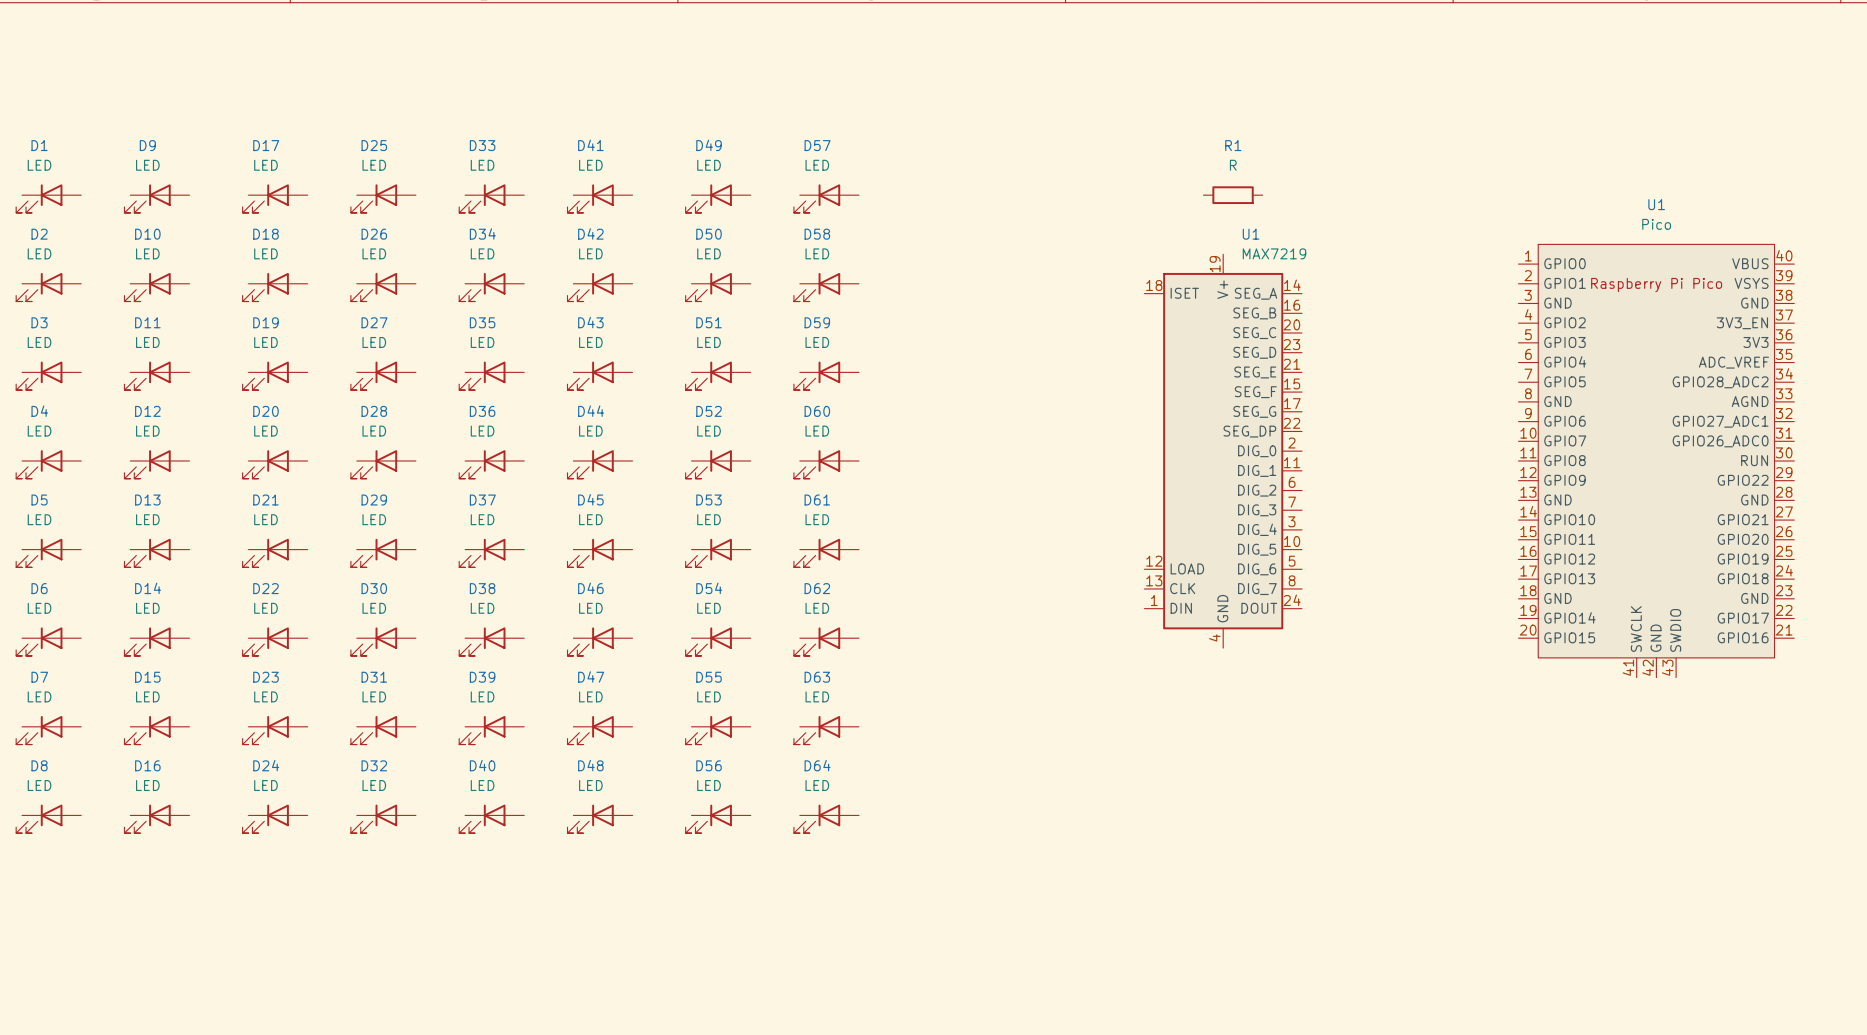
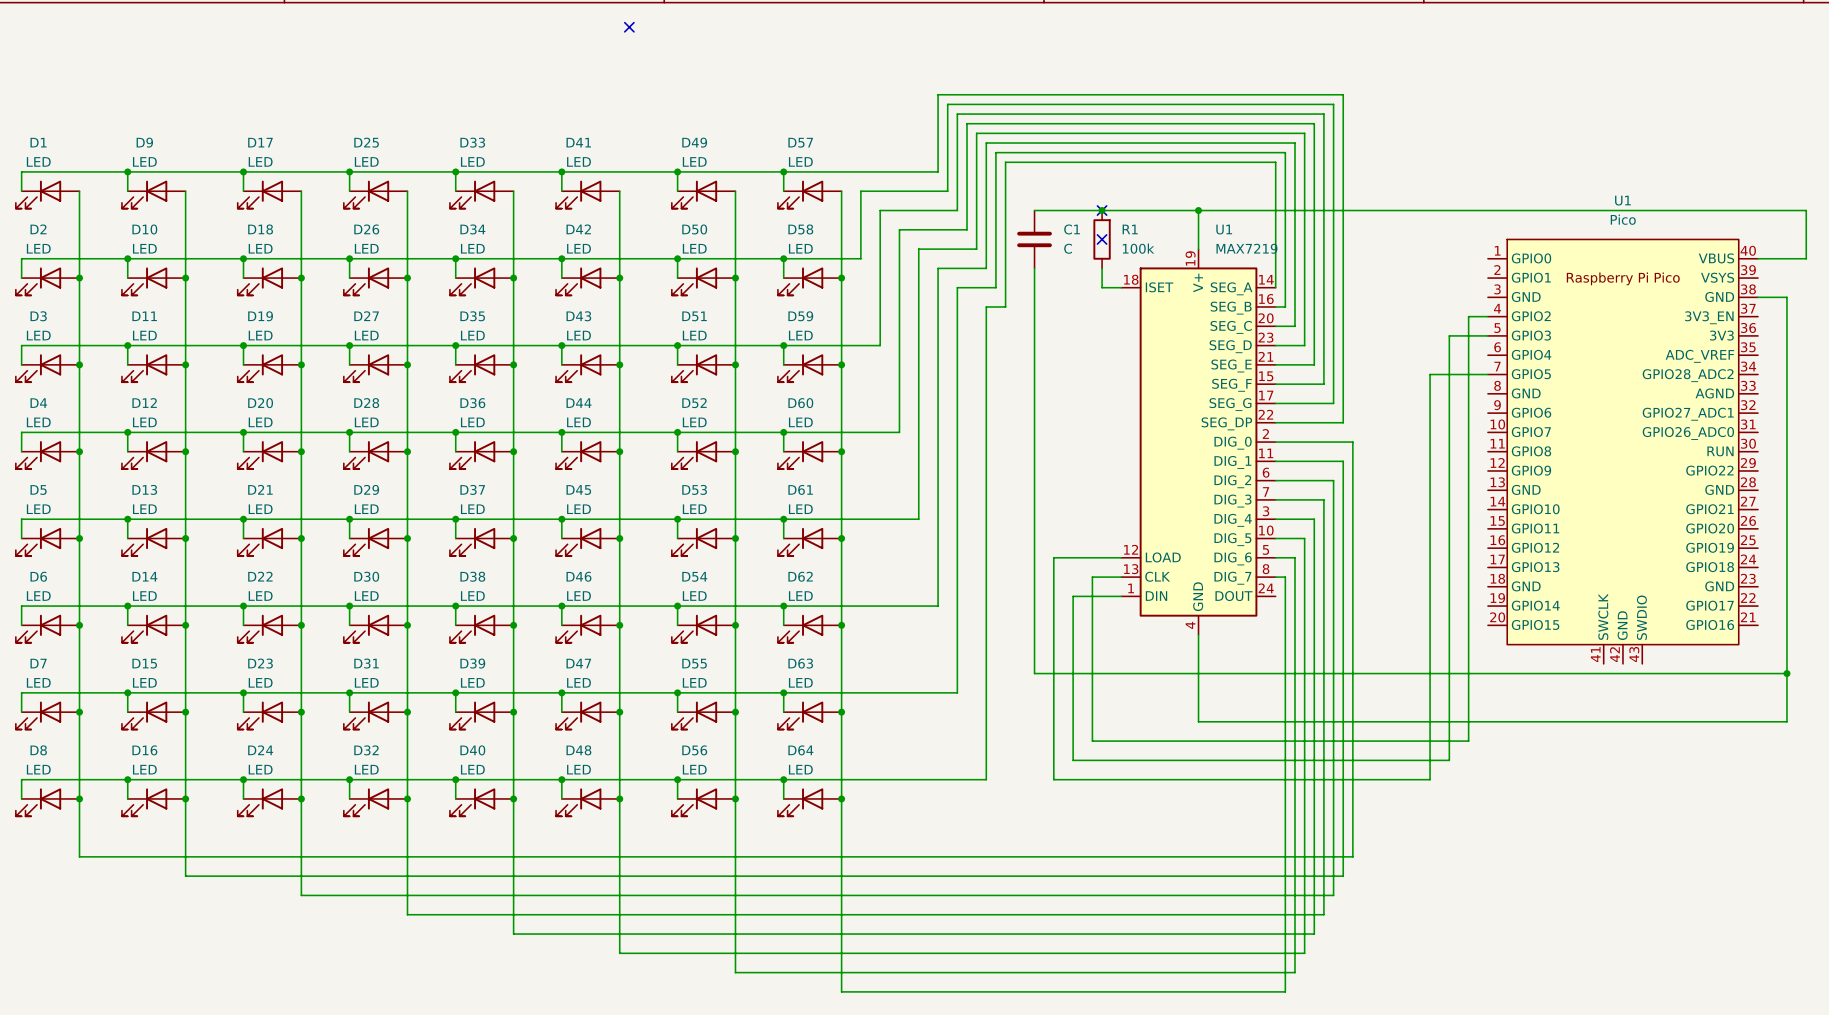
no-connect mark: none -> (629, 27)
R1 name position: R1 (1233, 145) -> R1 (1130, 229)
R1 value: R (1233, 165) -> 100k (1138, 248)
wire: none -> (127, 171) (127, 191)
junction: none -> (127, 171)
wire: none -> (243, 171) (243, 191)
junction: none -> (243, 171)
wire: none -> (349, 171) (349, 191)
junction: none -> (349, 171)
wire: none -> (455, 171) (455, 191)
junction: none -> (455, 171)
wire: none -> (561, 171) (561, 191)
junction: none -> (561, 171)
wire: none -> (677, 171) (677, 191)
junction: none -> (677, 171)
wire: none -> (783, 171) (783, 191)
junction: none -> (783, 171)
wire: none -> (21, 191) (21, 171) (938, 171) (938, 94) (1343, 94) (1343, 422) (1275, 422)
wire: none -> (79, 191) (79, 856) (1352, 856) (1352, 442) (1275, 442)
wire: none -> (185, 191) (185, 876) (1343, 876) (1343, 461) (1275, 461)
wire: none -> (301, 191) (301, 895) (1333, 895) (1333, 480) (1275, 480)
wire: none -> (407, 191) (407, 914) (1323, 914) (1323, 499) (1275, 499)
wire: none -> (513, 191) (513, 934) (1314, 934) (1314, 519) (1275, 519)
wire: none -> (619, 191) (619, 953) (1304, 953) (1304, 538) (1275, 538)
wire: none -> (735, 191) (735, 972) (1294, 972) (1294, 557) (1275, 557)
wire: none -> (841, 191) (841, 991) (1285, 991) (1285, 577) (1275, 577)
R1 rotation: 0° (1233, 195) -> 90° clockwise (1102, 239)
R1 position: (1233, 195) -> (1102, 239)
wire: none -> (1034, 210) (1806, 210) (1806, 258) (1758, 258)
junction: none -> (1102, 210)
no-connect mark: none -> (1102, 210)
wire: none -> (1198, 210) (1198, 249)
junction: none -> (1198, 210)
C1: none -> C (1034, 239)
no-connect mark: none -> (1102, 239)
wire: none -> (127, 258) (127, 278)
junction: none -> (127, 258)
wire: none -> (243, 258) (243, 278)
junction: none -> (243, 258)
wire: none -> (349, 258) (349, 278)
junction: none -> (349, 258)
wire: none -> (455, 258) (455, 278)
junction: none -> (455, 258)
wire: none -> (561, 258) (561, 278)
junction: none -> (561, 258)
wire: none -> (677, 258) (677, 278)
junction: none -> (677, 258)
wire: none -> (783, 258) (783, 278)
junction: none -> (783, 258)
wire: none -> (1034, 268) (1034, 673) (1786, 673)
wire: none -> (1102, 268) (1102, 287) (1121, 287)
wire: none -> (21, 278) (21, 258) (860, 258) (860, 191) (947, 191) (947, 104) (1333, 104) (1333, 403) (1275, 403)
junction: none -> (79, 278)
junction: none -> (185, 278)
junction: none -> (301, 278)
junction: none -> (407, 278)
junction: none -> (513, 278)
junction: none -> (619, 278)
junction: none -> (735, 278)
junction: none -> (841, 278)
wire: none -> (1275, 287) (1275, 162) (1005, 162) (1005, 306) (986, 306) (986, 779) (21, 779) (21, 798)
wire: none -> (1758, 297) (1786, 297) (1786, 721) (1198, 721) (1198, 634)
wire: none -> (1275, 306) (1285, 306) (1285, 152) (995, 152) (995, 287) (957, 287) (957, 692) (21, 692) (21, 712)
wire: none -> (1487, 316) (1468, 316) (1468, 741) (1092, 741) (1092, 577) (1121, 577)
wire: none -> (1275, 326) (1294, 326) (1294, 143) (986, 143) (986, 268) (938, 268) (938, 606) (21, 606) (21, 625)
wire: none -> (1487, 335) (1449, 335) (1449, 760) (1073, 760) (1073, 596) (1121, 596)
wire: none -> (127, 345) (127, 364)
junction: none -> (127, 345)
wire: none -> (243, 345) (243, 364)
junction: none -> (243, 345)
wire: none -> (349, 345) (349, 364)
junction: none -> (349, 345)
wire: none -> (455, 345) (455, 364)
junction: none -> (455, 345)
wire: none -> (561, 345) (561, 364)
junction: none -> (561, 345)
wire: none -> (677, 345) (677, 364)
junction: none -> (677, 345)
wire: none -> (783, 345) (783, 364)
junction: none -> (783, 345)
wire: none -> (1275, 345) (1304, 345) (1304, 133) (976, 133) (976, 249) (918, 249) (918, 519) (21, 519) (21, 538)
wire: none -> (21, 364) (21, 345) (880, 345) (880, 210) (957, 210) (957, 114) (1323, 114) (1323, 384) (1275, 384)
junction: none -> (79, 364)
junction: none -> (185, 364)
junction: none -> (301, 364)
junction: none -> (407, 364)
junction: none -> (513, 364)
junction: none -> (619, 364)
junction: none -> (735, 364)
junction: none -> (841, 364)
wire: none -> (1275, 364) (1314, 364) (1314, 123) (967, 123) (967, 229) (899, 229) (899, 432) (21, 432) (21, 451)
wire: none -> (1487, 374) (1430, 374) (1430, 779) (1053, 779) (1053, 557) (1121, 557)
wire: none -> (127, 432) (127, 451)
junction: none -> (127, 432)
wire: none -> (243, 432) (243, 451)
junction: none -> (243, 432)
wire: none -> (349, 432) (349, 451)
junction: none -> (349, 432)
wire: none -> (455, 432) (455, 451)
junction: none -> (455, 432)
wire: none -> (561, 432) (561, 451)
junction: none -> (561, 432)
wire: none -> (677, 432) (677, 451)
junction: none -> (677, 432)
wire: none -> (783, 432) (783, 451)
junction: none -> (783, 432)
junction: none -> (79, 451)
junction: none -> (185, 451)
junction: none -> (301, 451)
junction: none -> (407, 451)
junction: none -> (513, 451)
junction: none -> (619, 451)
junction: none -> (735, 451)
junction: none -> (841, 451)
wire: none -> (127, 519) (127, 538)
junction: none -> (127, 519)
wire: none -> (243, 519) (243, 538)
junction: none -> (243, 519)
wire: none -> (349, 519) (349, 538)
junction: none -> (349, 519)
wire: none -> (455, 519) (455, 538)
junction: none -> (455, 519)
wire: none -> (561, 519) (561, 538)
junction: none -> (561, 519)
wire: none -> (677, 519) (677, 538)
junction: none -> (677, 519)
wire: none -> (783, 519) (783, 538)
junction: none -> (783, 519)
junction: none -> (79, 538)
junction: none -> (185, 538)
junction: none -> (301, 538)
junction: none -> (407, 538)
junction: none -> (513, 538)
junction: none -> (619, 538)
junction: none -> (735, 538)
junction: none -> (841, 538)
wire: none -> (127, 606) (127, 625)
junction: none -> (127, 606)
wire: none -> (243, 606) (243, 625)
junction: none -> (243, 606)
wire: none -> (349, 606) (349, 625)
junction: none -> (349, 606)
wire: none -> (455, 606) (455, 625)
junction: none -> (455, 606)
wire: none -> (561, 606) (561, 625)
junction: none -> (561, 606)
wire: none -> (677, 606) (677, 625)
junction: none -> (677, 606)
wire: none -> (783, 606) (783, 625)
junction: none -> (783, 606)
junction: none -> (79, 625)
junction: none -> (185, 625)
junction: none -> (301, 625)
junction: none -> (407, 625)
junction: none -> (513, 625)
junction: none -> (619, 625)
junction: none -> (735, 625)
junction: none -> (841, 625)
junction: none -> (1786, 673)
wire: none -> (127, 692) (127, 712)
junction: none -> (127, 692)
wire: none -> (243, 692) (243, 712)
junction: none -> (243, 692)
wire: none -> (349, 692) (349, 712)
junction: none -> (349, 692)
wire: none -> (455, 692) (455, 712)
junction: none -> (455, 692)
wire: none -> (561, 692) (561, 712)
junction: none -> (561, 692)
wire: none -> (677, 692) (677, 712)
junction: none -> (677, 692)
wire: none -> (783, 692) (783, 712)
junction: none -> (783, 692)
junction: none -> (79, 712)
junction: none -> (185, 712)
junction: none -> (301, 712)
junction: none -> (407, 712)
junction: none -> (513, 712)
junction: none -> (619, 712)
junction: none -> (735, 712)
junction: none -> (841, 712)
wire: none -> (127, 779) (127, 798)
junction: none -> (127, 779)
wire: none -> (243, 779) (243, 798)
junction: none -> (243, 779)
wire: none -> (349, 779) (349, 798)
junction: none -> (349, 779)
wire: none -> (455, 779) (455, 798)
junction: none -> (455, 779)
wire: none -> (561, 779) (561, 798)
junction: none -> (561, 779)
wire: none -> (677, 779) (677, 798)
junction: none -> (677, 779)
wire: none -> (783, 779) (783, 798)
junction: none -> (783, 779)
junction: none -> (79, 798)
junction: none -> (185, 798)
junction: none -> (301, 798)
junction: none -> (407, 798)
junction: none -> (513, 798)
junction: none -> (619, 798)
junction: none -> (735, 798)
junction: none -> (841, 798)

